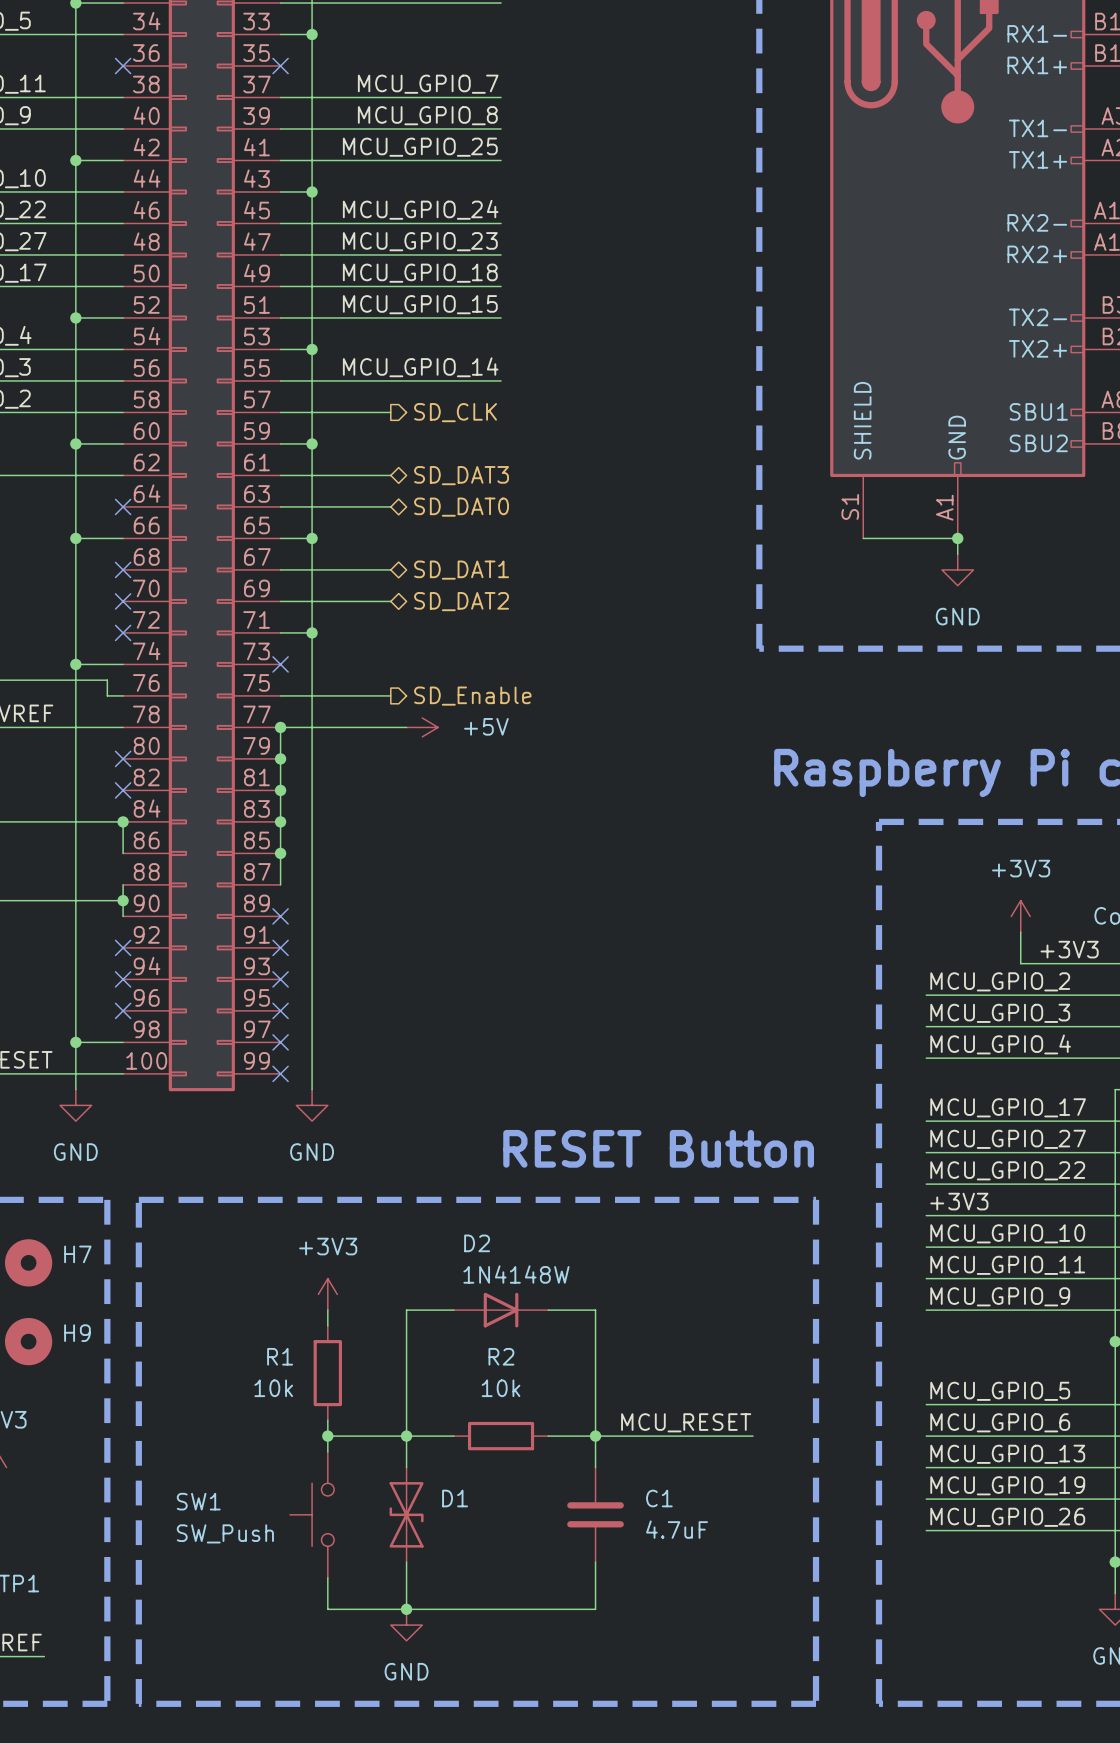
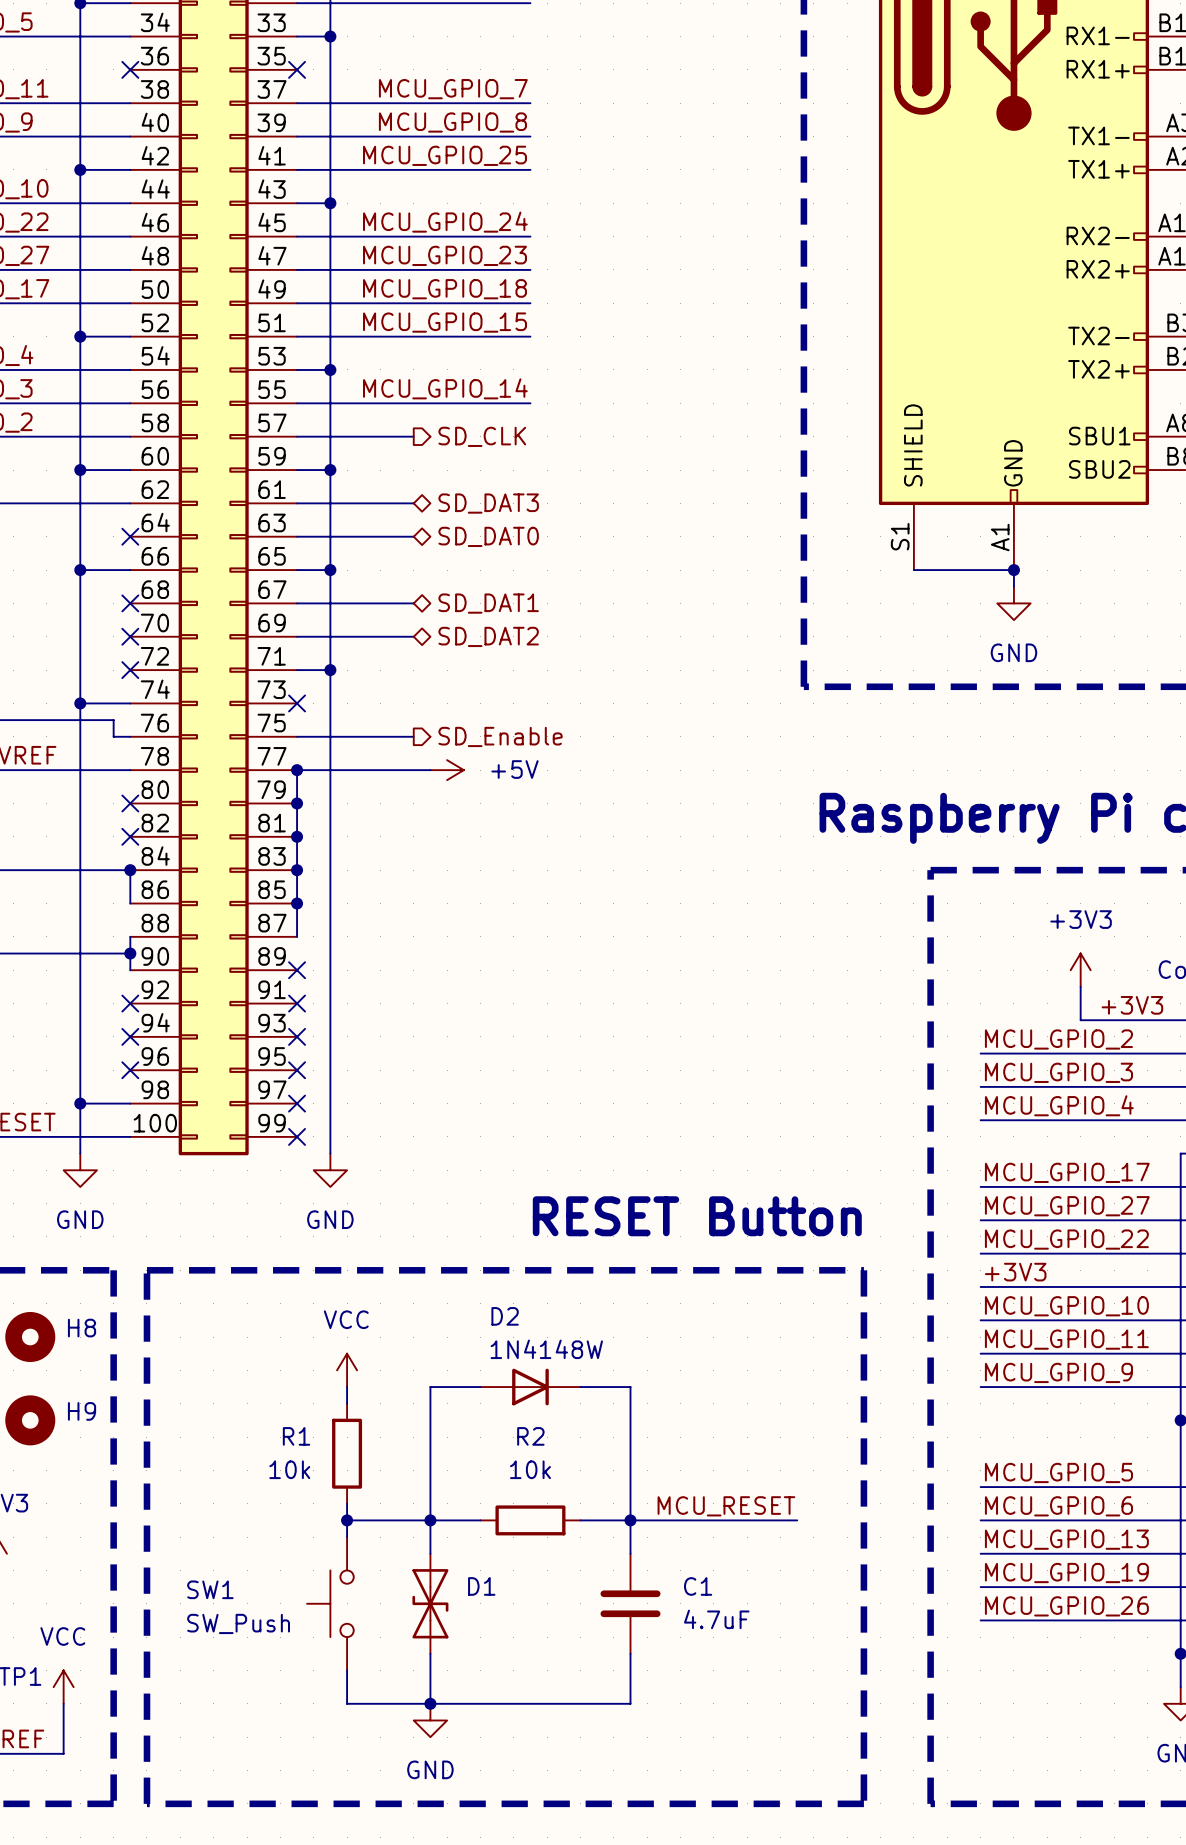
H7 name: H7 (77, 1254) -> H8 (82, 1328)
power symbol: +3V3 (327, 1294) -> VCC (347, 1370)
power symbol: none -> VCC (63, 1687)
wire: none -> (63, 1703) (63, 1753) (46, 1753)

